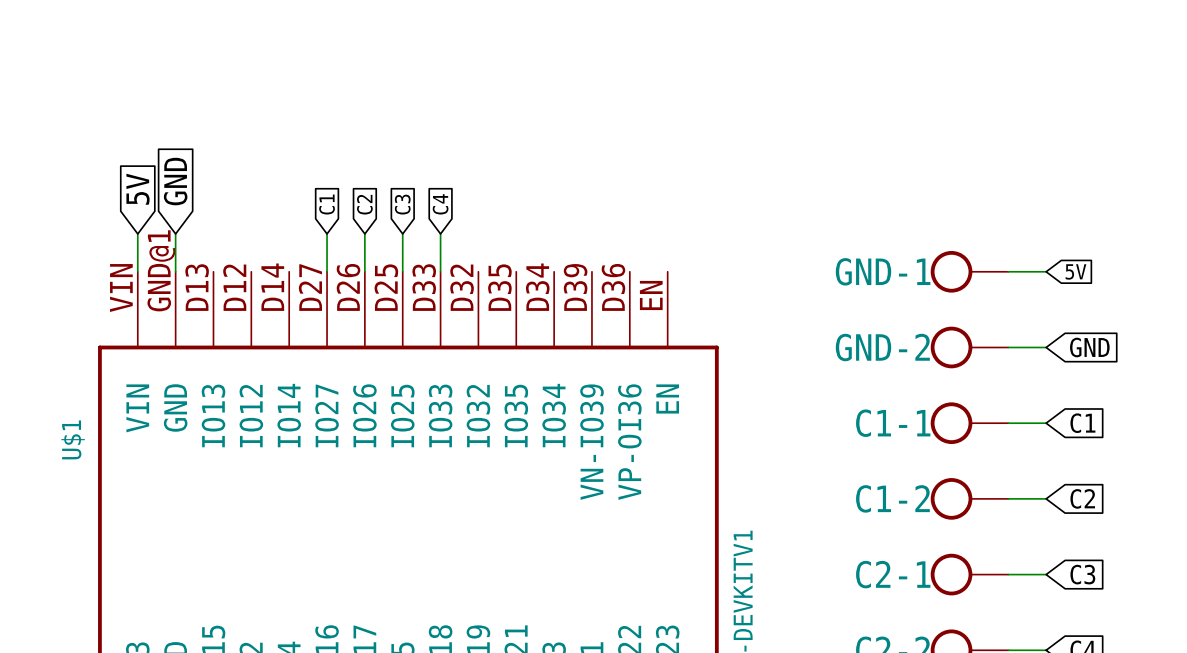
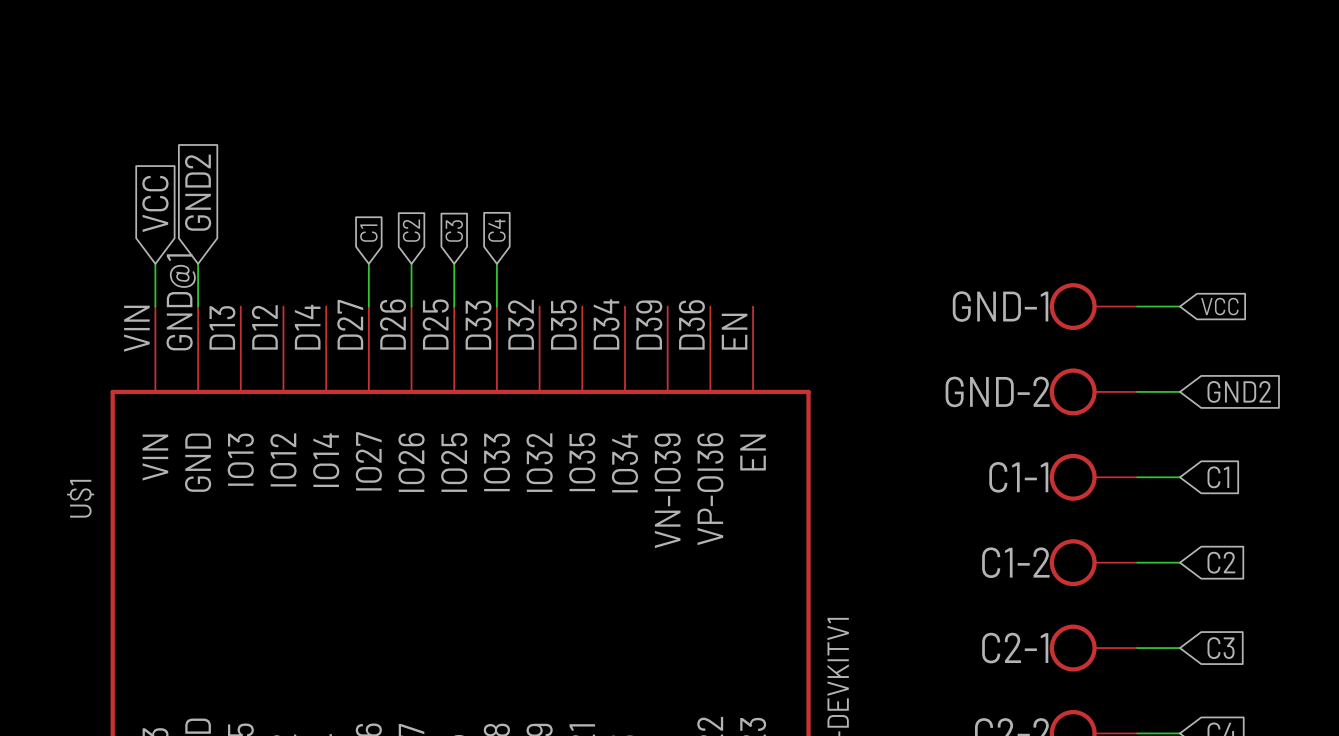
global label: GND (175, 181) -> GND2 (198, 192)
global label: 5V (138, 189) -> VCC (155, 203)
global label: 5V (1075, 271) -> VCC (1219, 306)
global label: GND (1089, 347) -> GND2 (1239, 391)

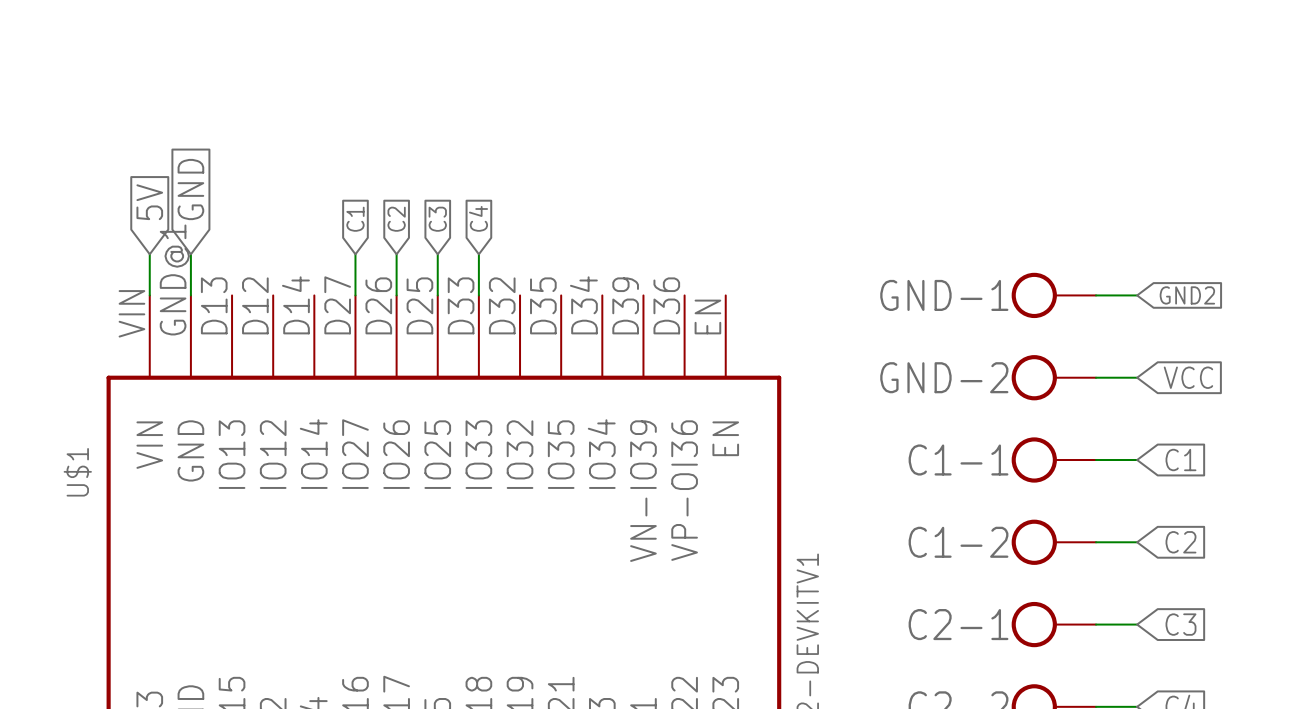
global label: GND2 (198, 192) -> GND (190, 189)
global label: VCC (155, 203) -> 5V (149, 202)
global label: VCC (1219, 306) -> GND2 (1187, 295)
global label: GND2 (1239, 391) -> VCC (1188, 377)

